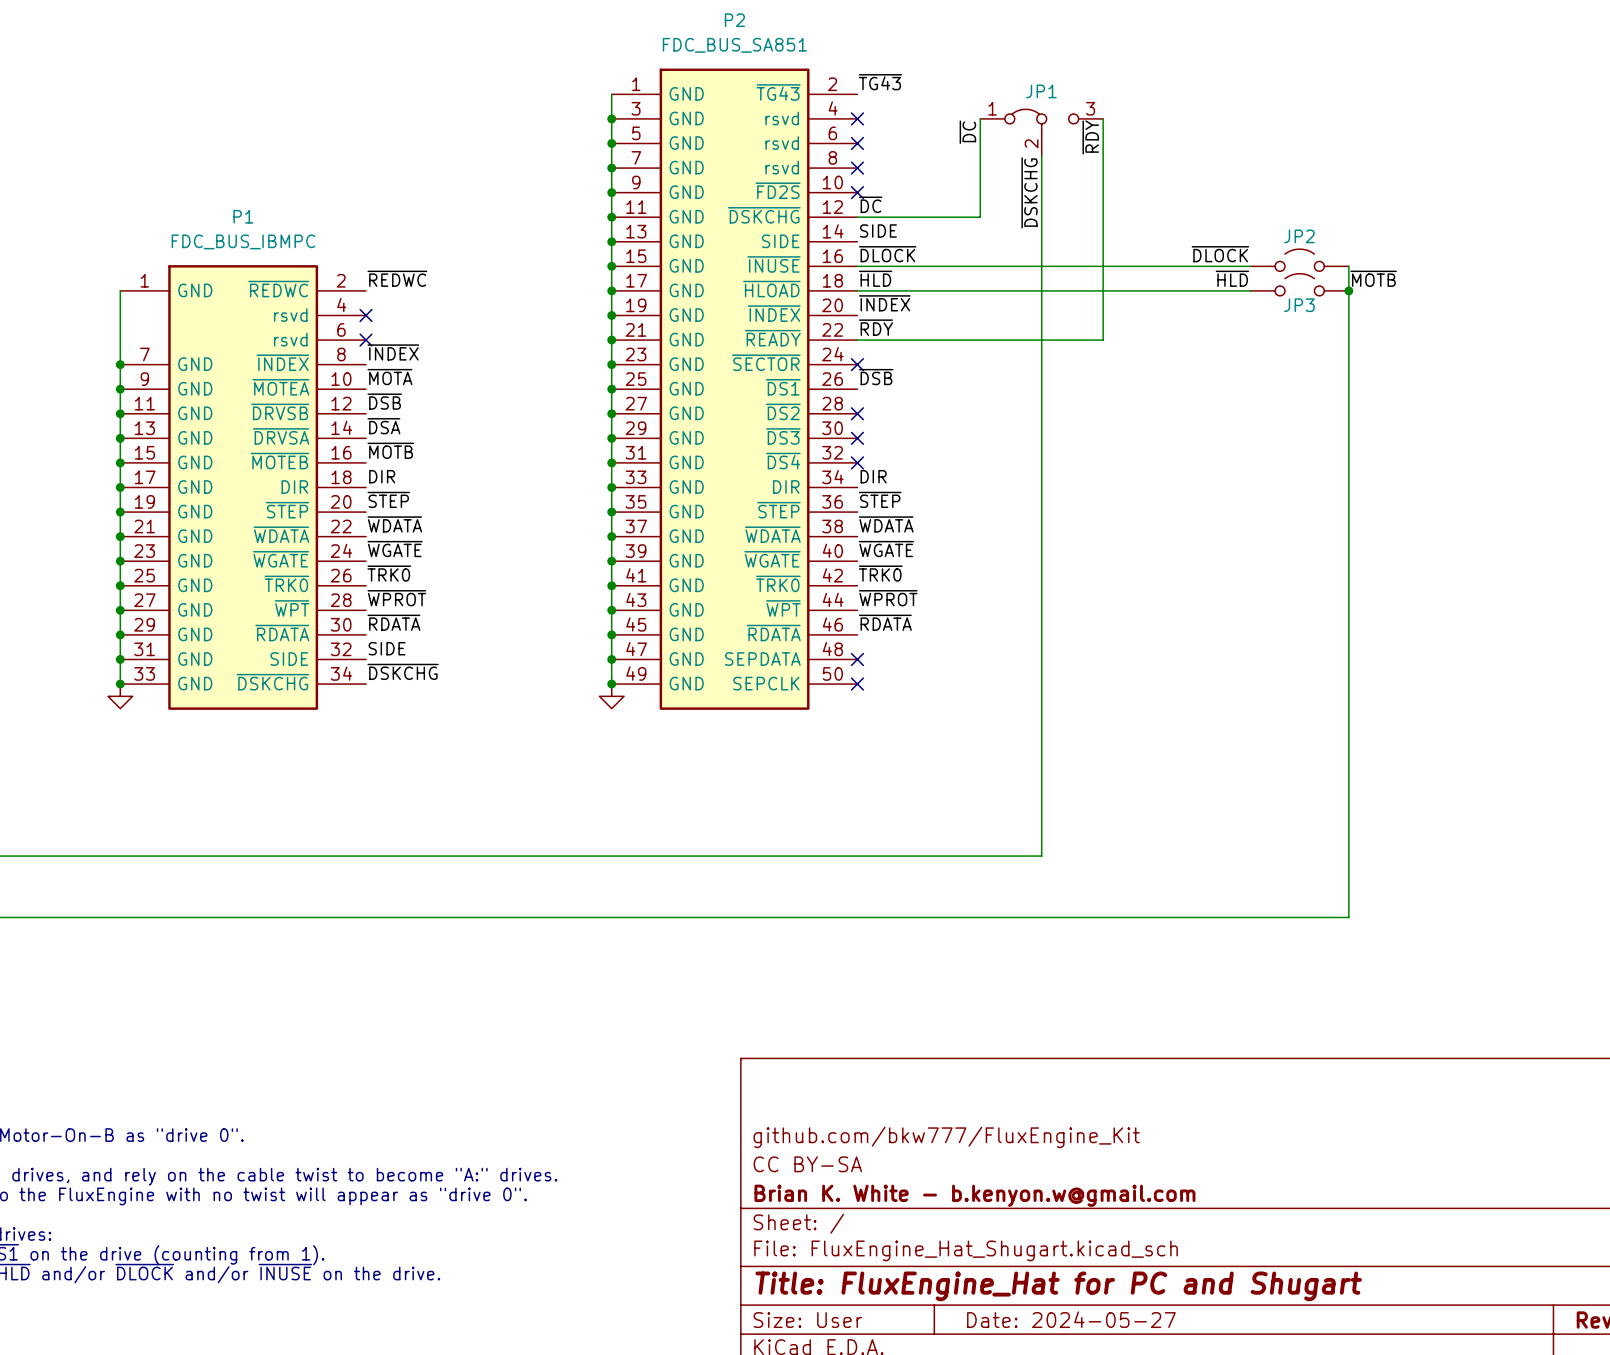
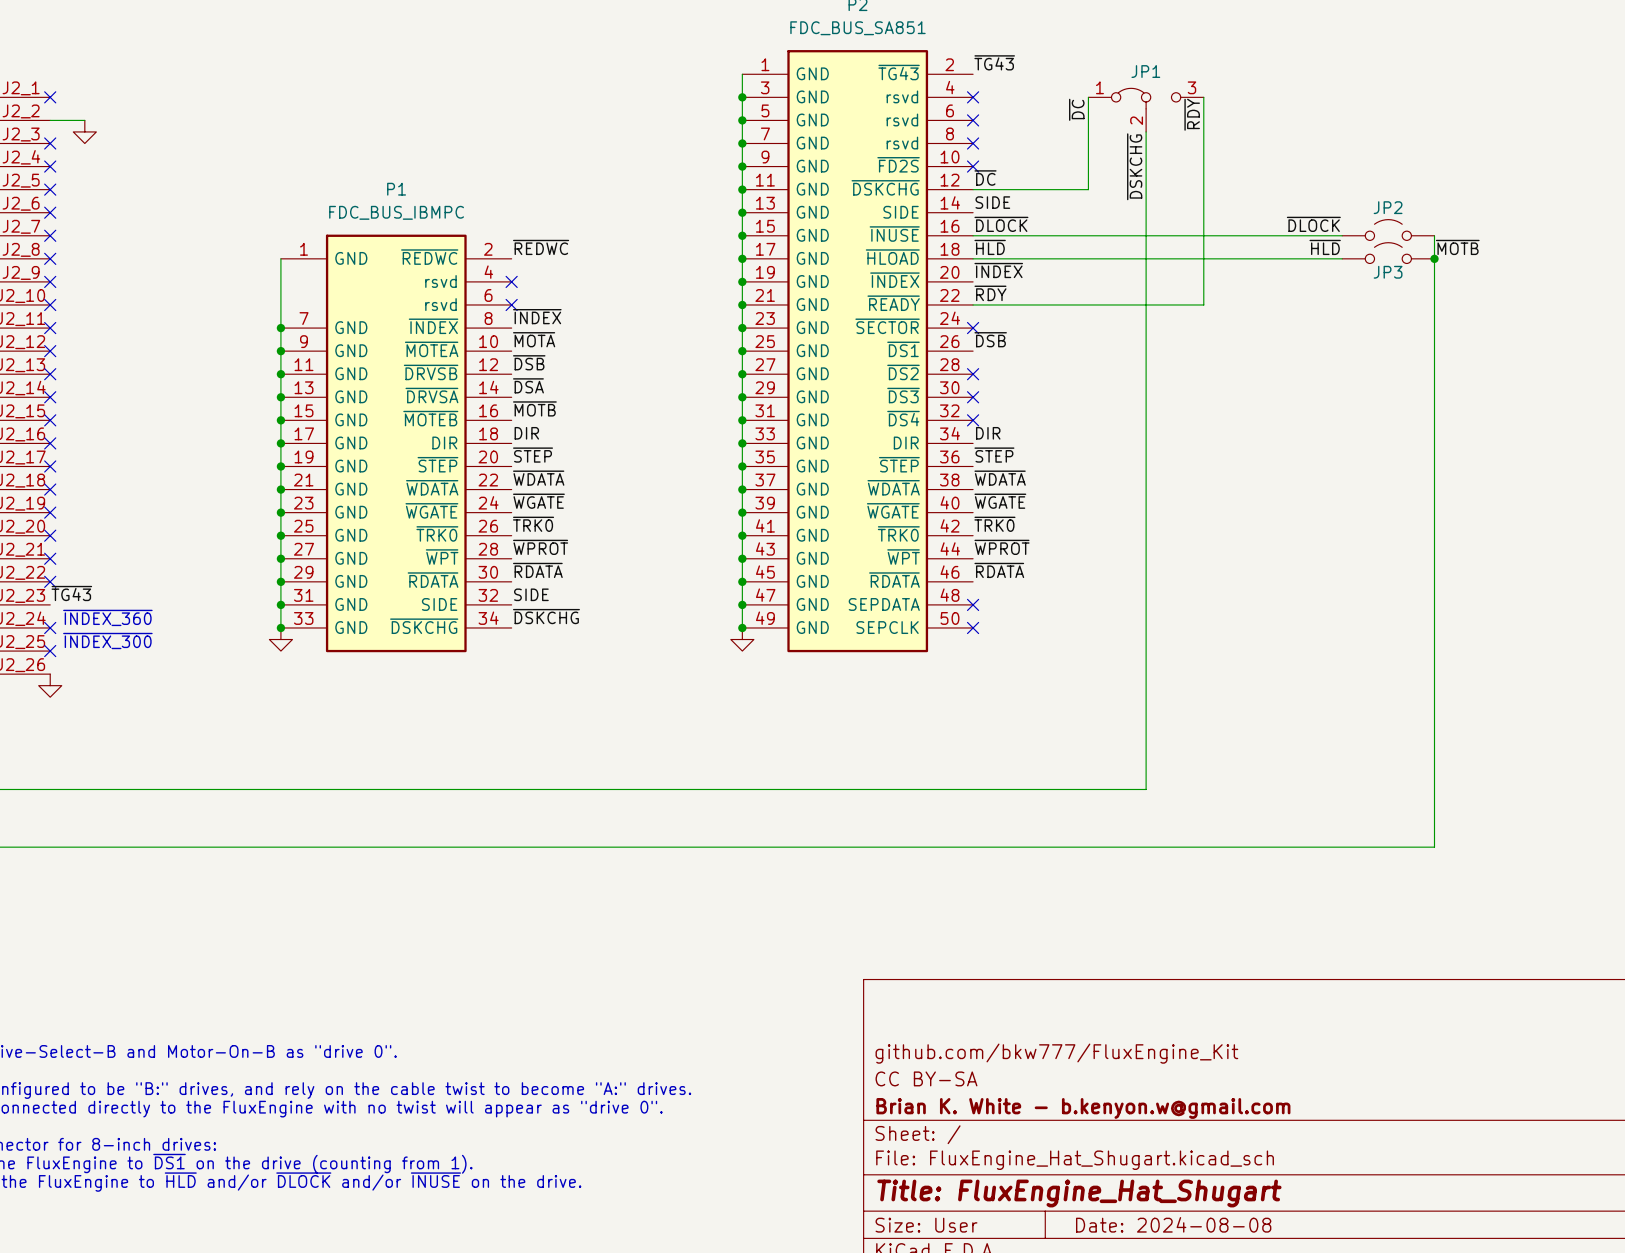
title block: Title: FluxEngine_Hat for PC and Shugart (1058, 1286) -> Title: FluxEngine_Hat_Shugart (1079, 1193)
title block: Date: 2024-05-27 (1071, 1319) -> Date: 2024-08-08 (1173, 1224)

